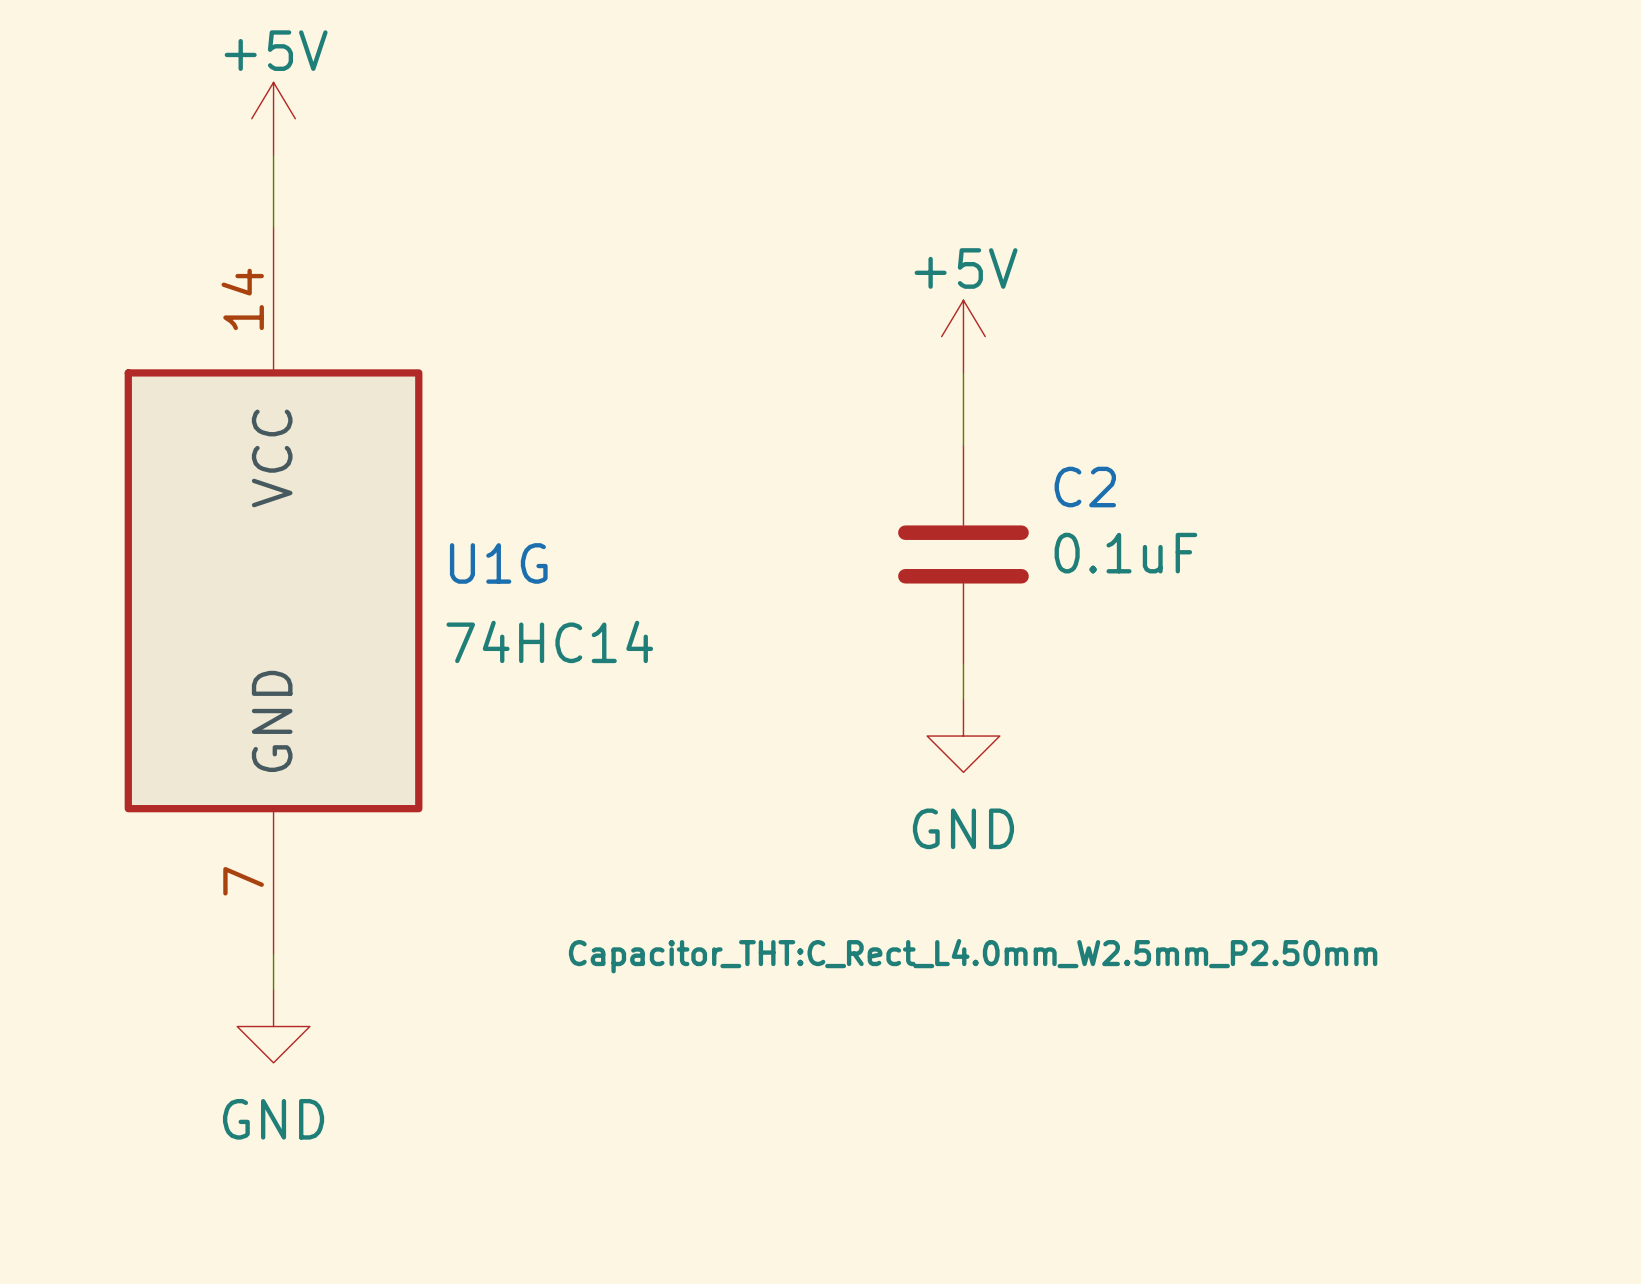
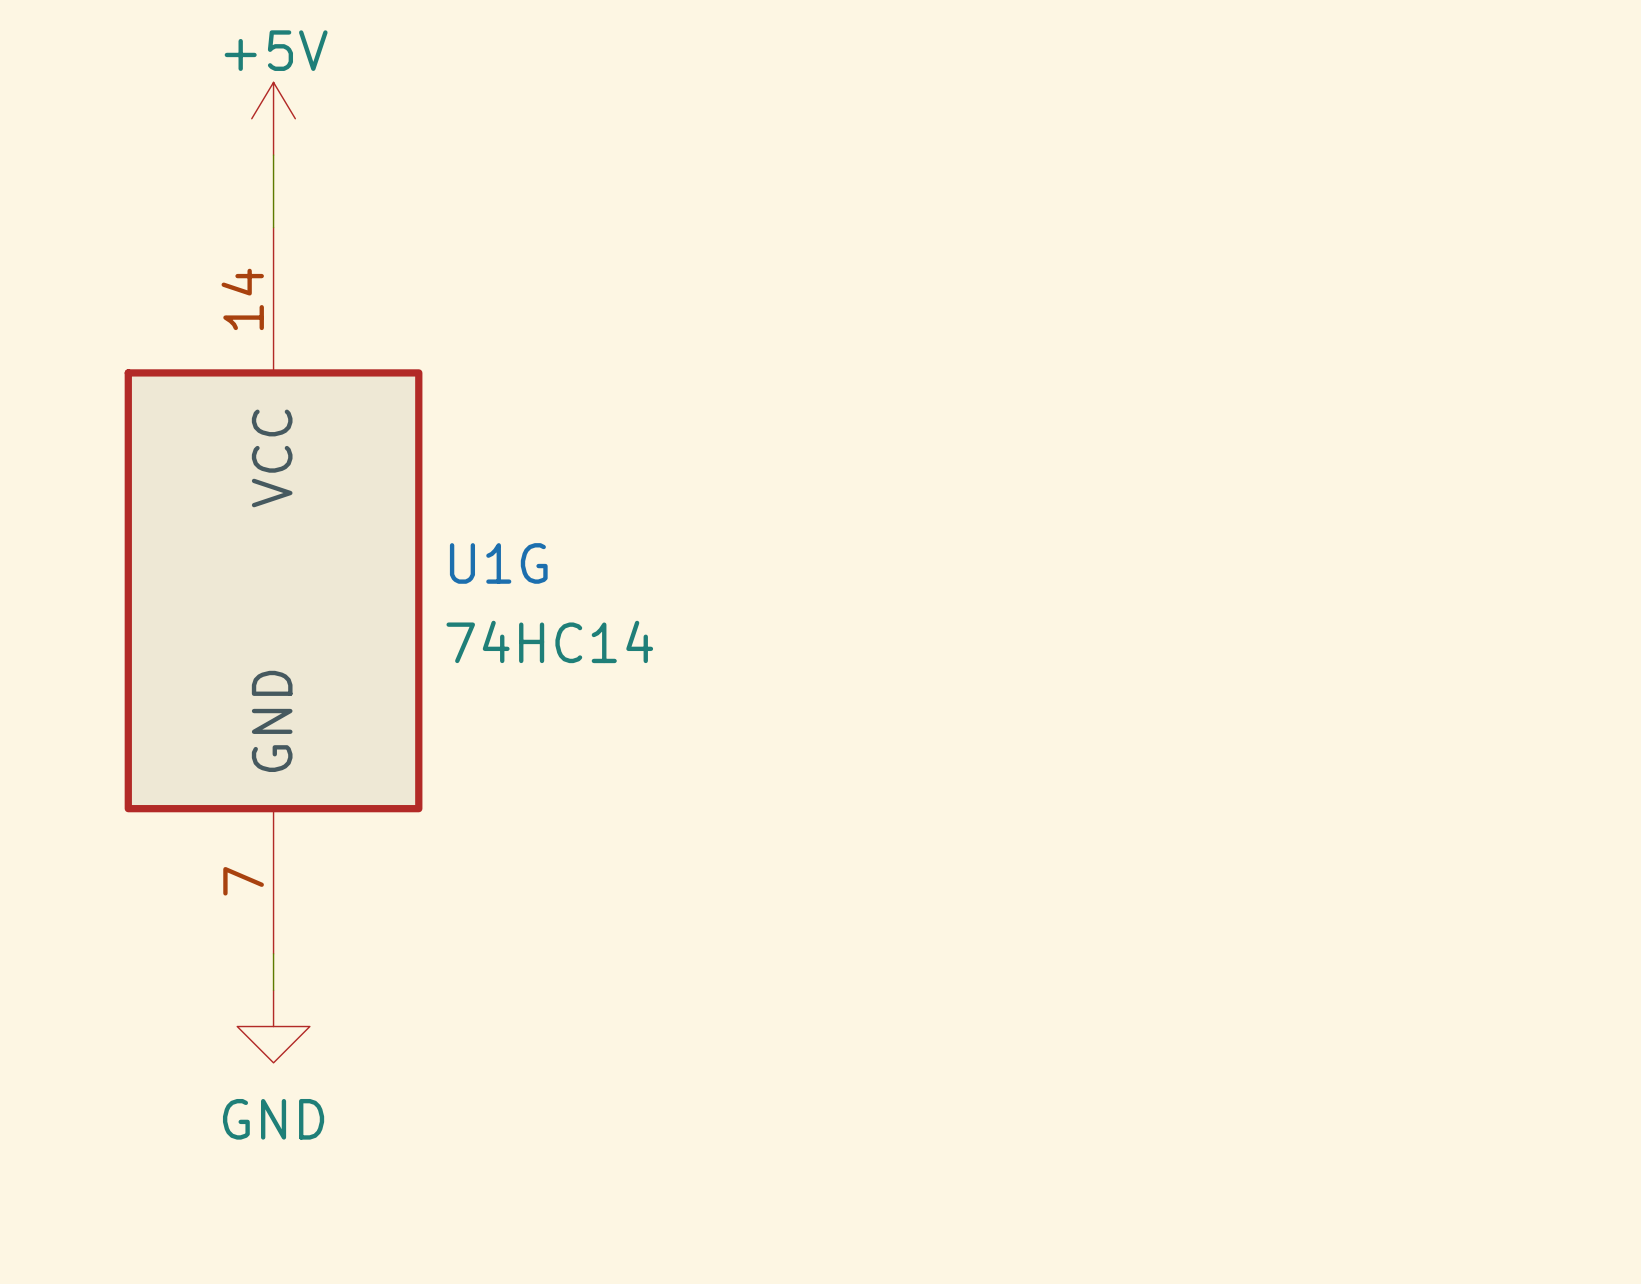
power symbol: +5V (963, 336) -> none
wire: (963, 372) (963, 445) -> none
C2: 0.1uF (963, 554) -> none
wire: (963, 663) (963, 699) -> none
power symbol: GND (963, 736) -> none

